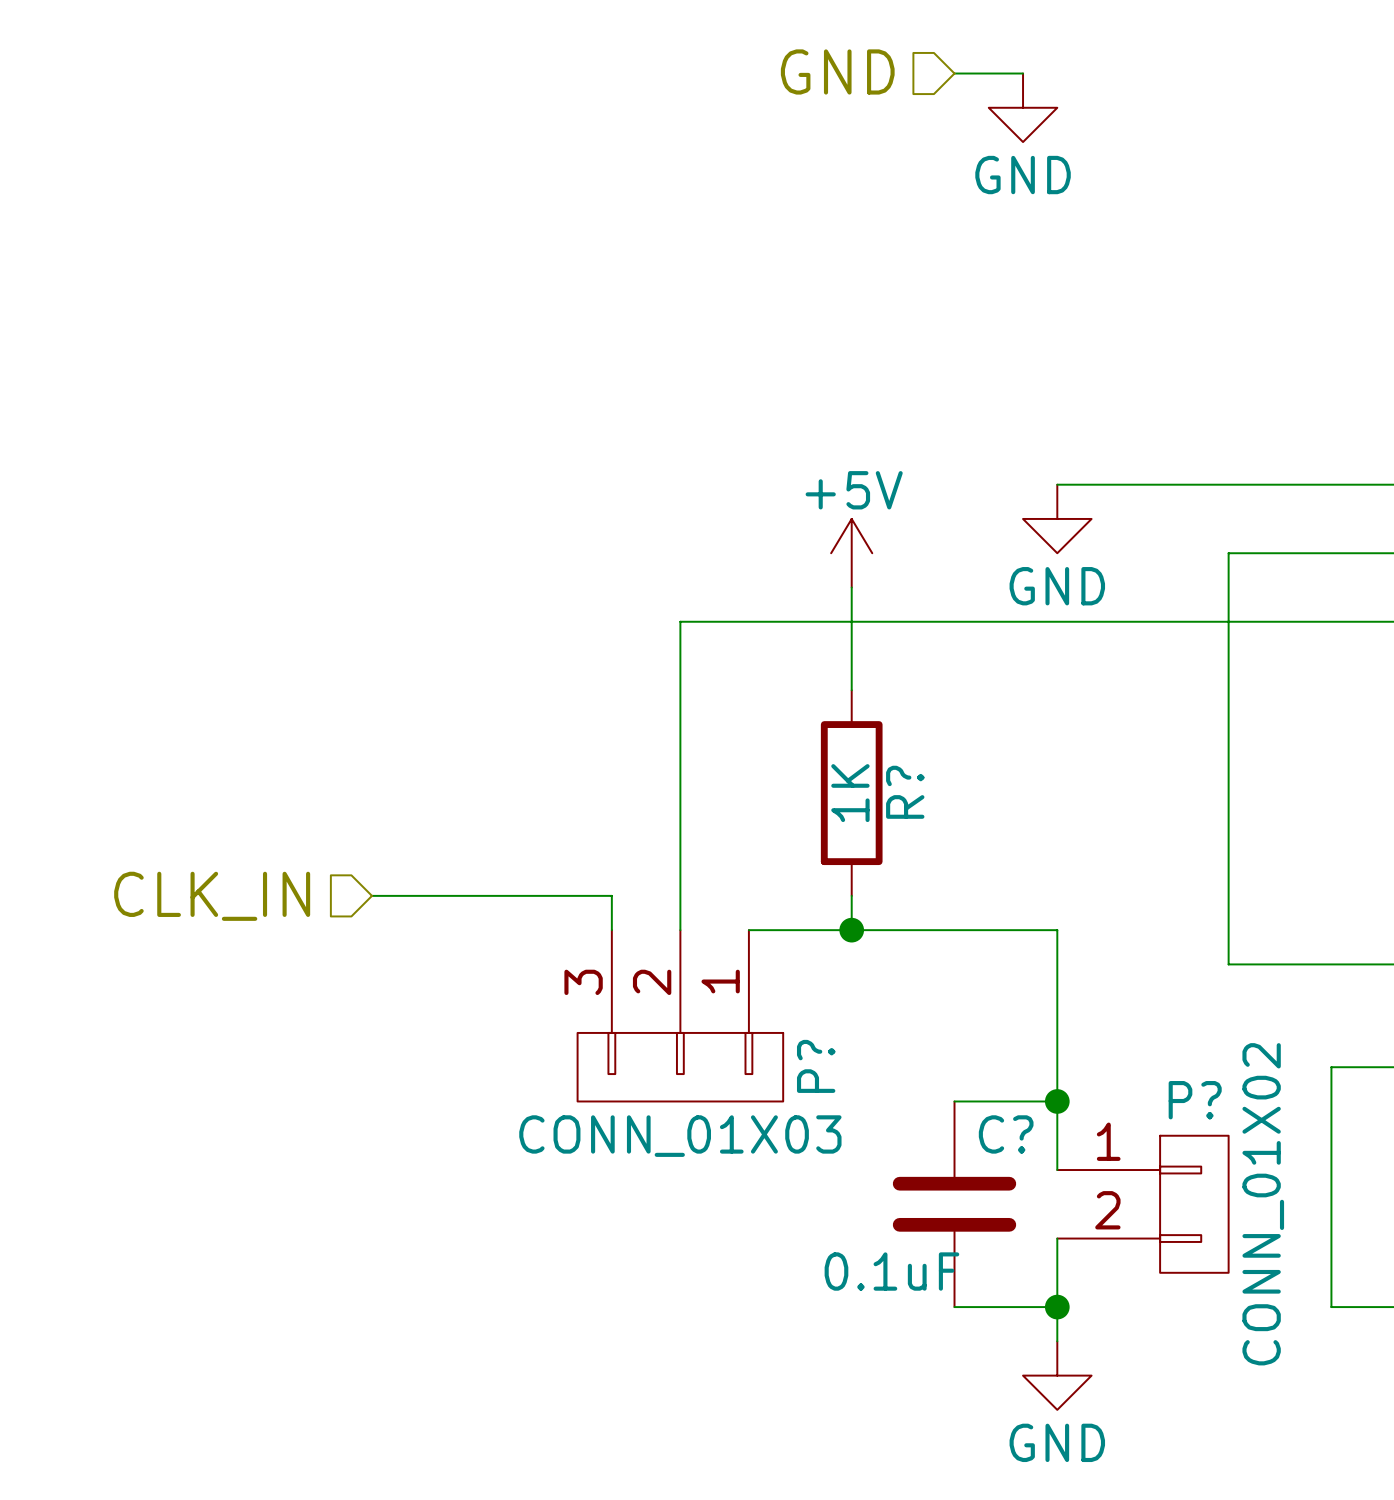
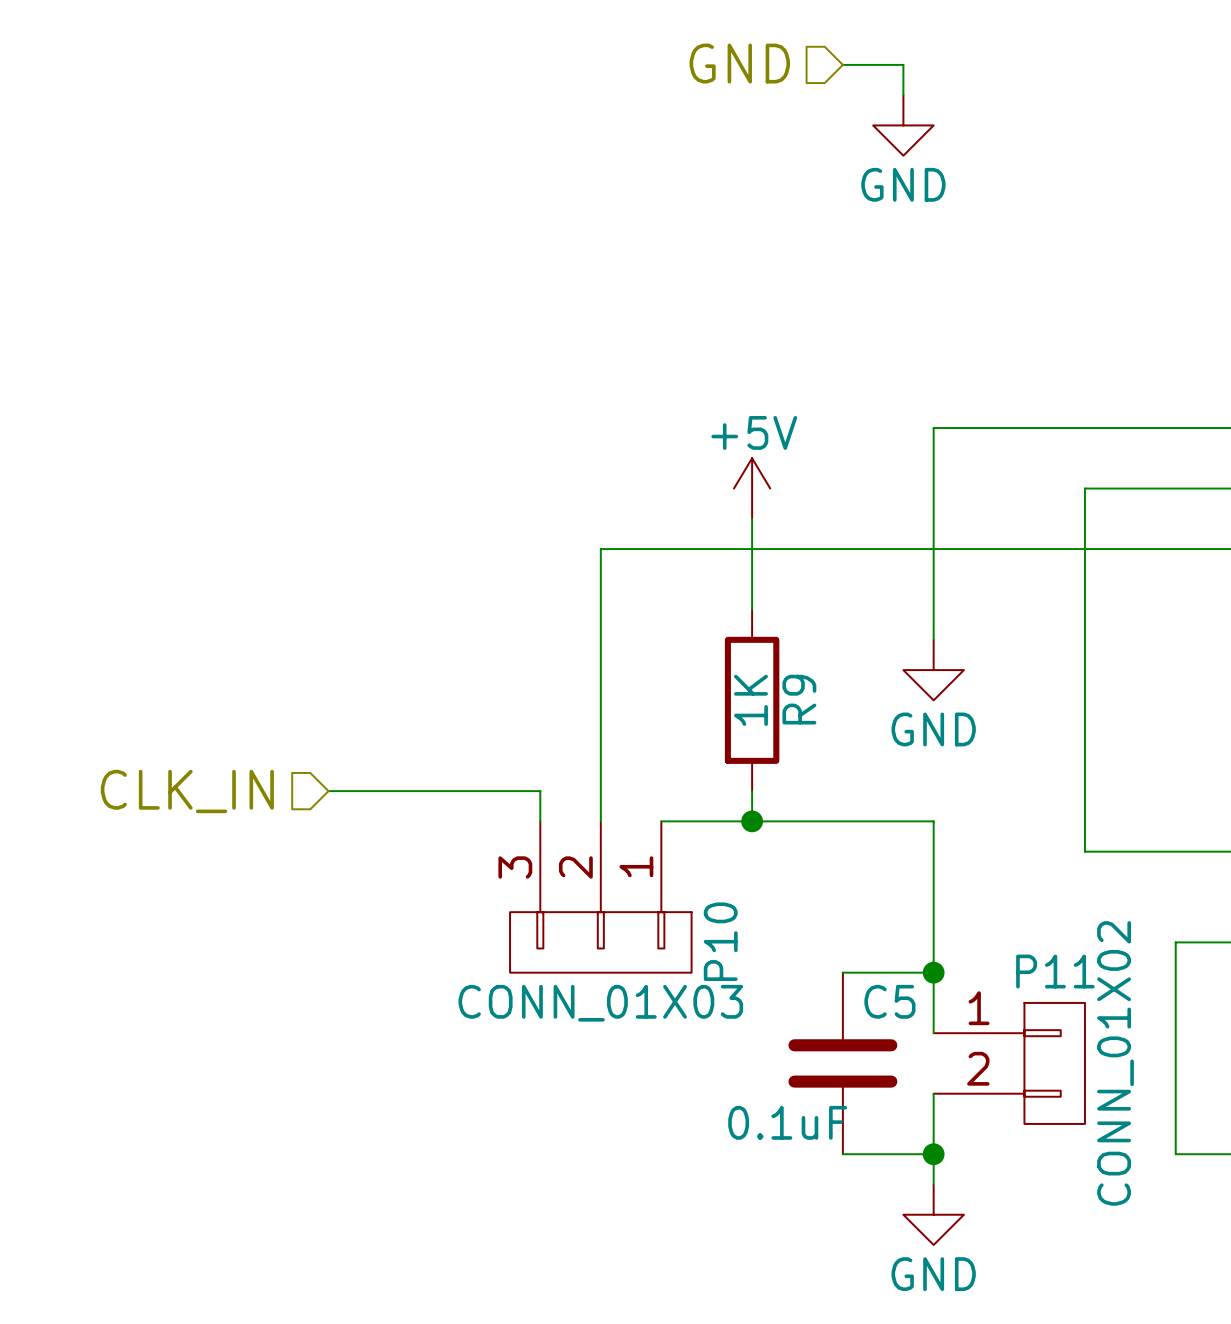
power symbol position: GND (1023, 107) -> GND (903, 125)
wire: none -> (933, 428) (933, 639)
power symbol: GND (1057, 518) -> none
power symbol: none -> GND (933, 670)
R? name: R? (905, 792) -> R9 (799, 699)
P? name: P? (816, 1066) -> P10 (720, 941)
P? name: P? (1195, 1100) -> P11 (1055, 971)
C? name: C? (1006, 1134) -> C5 (889, 1001)

